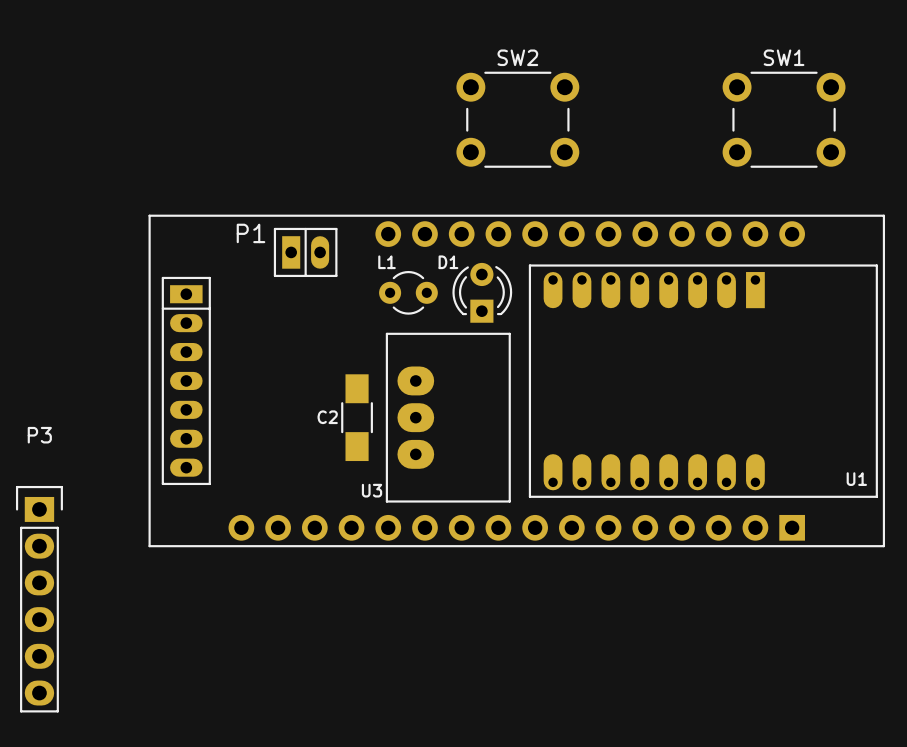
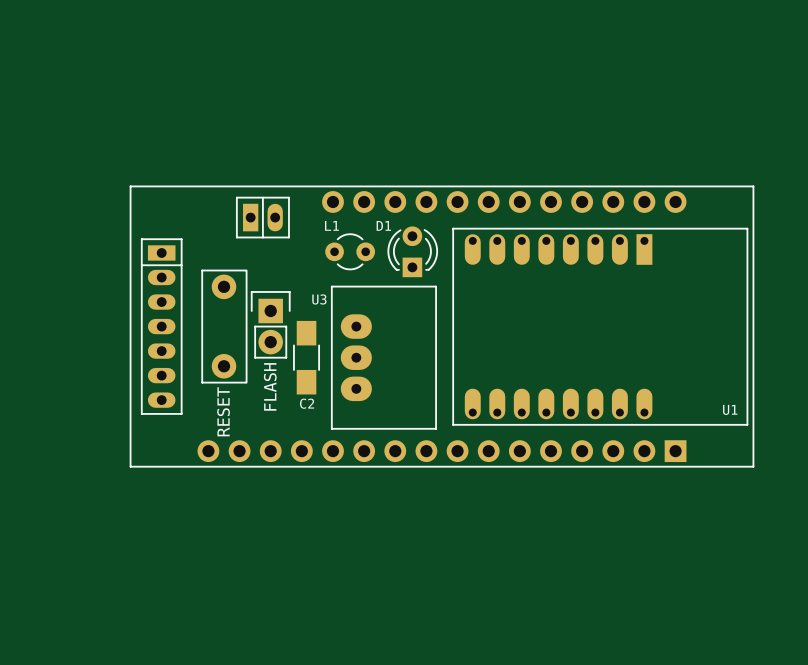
SW2: (517, 119) -> none
SW1: (784, 119) -> none
P1 name: P1 (250, 233) -> none
part: none -> FLASH (270, 324)
part: none -> RESET (224, 326)
C2 name position: C2 (327, 417) -> C2 (307, 403)
U3 name position: U3 (372, 490) -> U3 (319, 299)
P3: (39, 599) -> none

